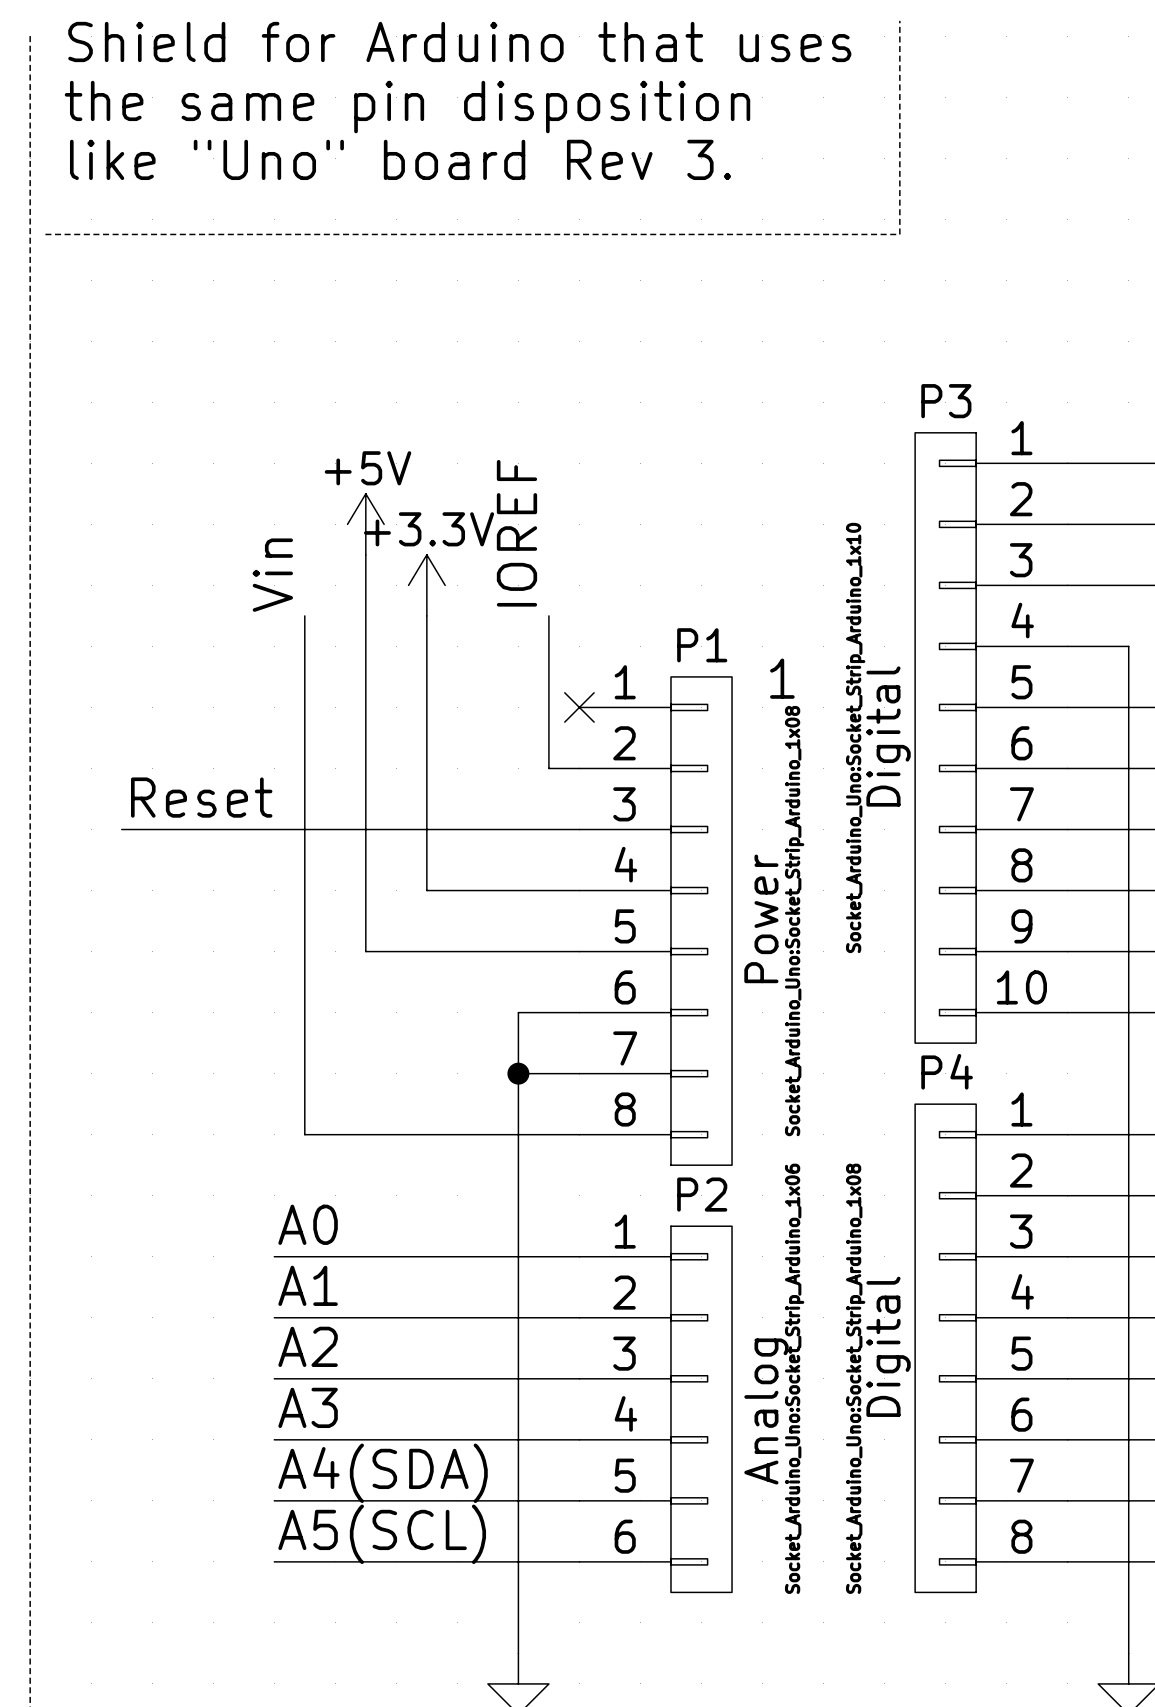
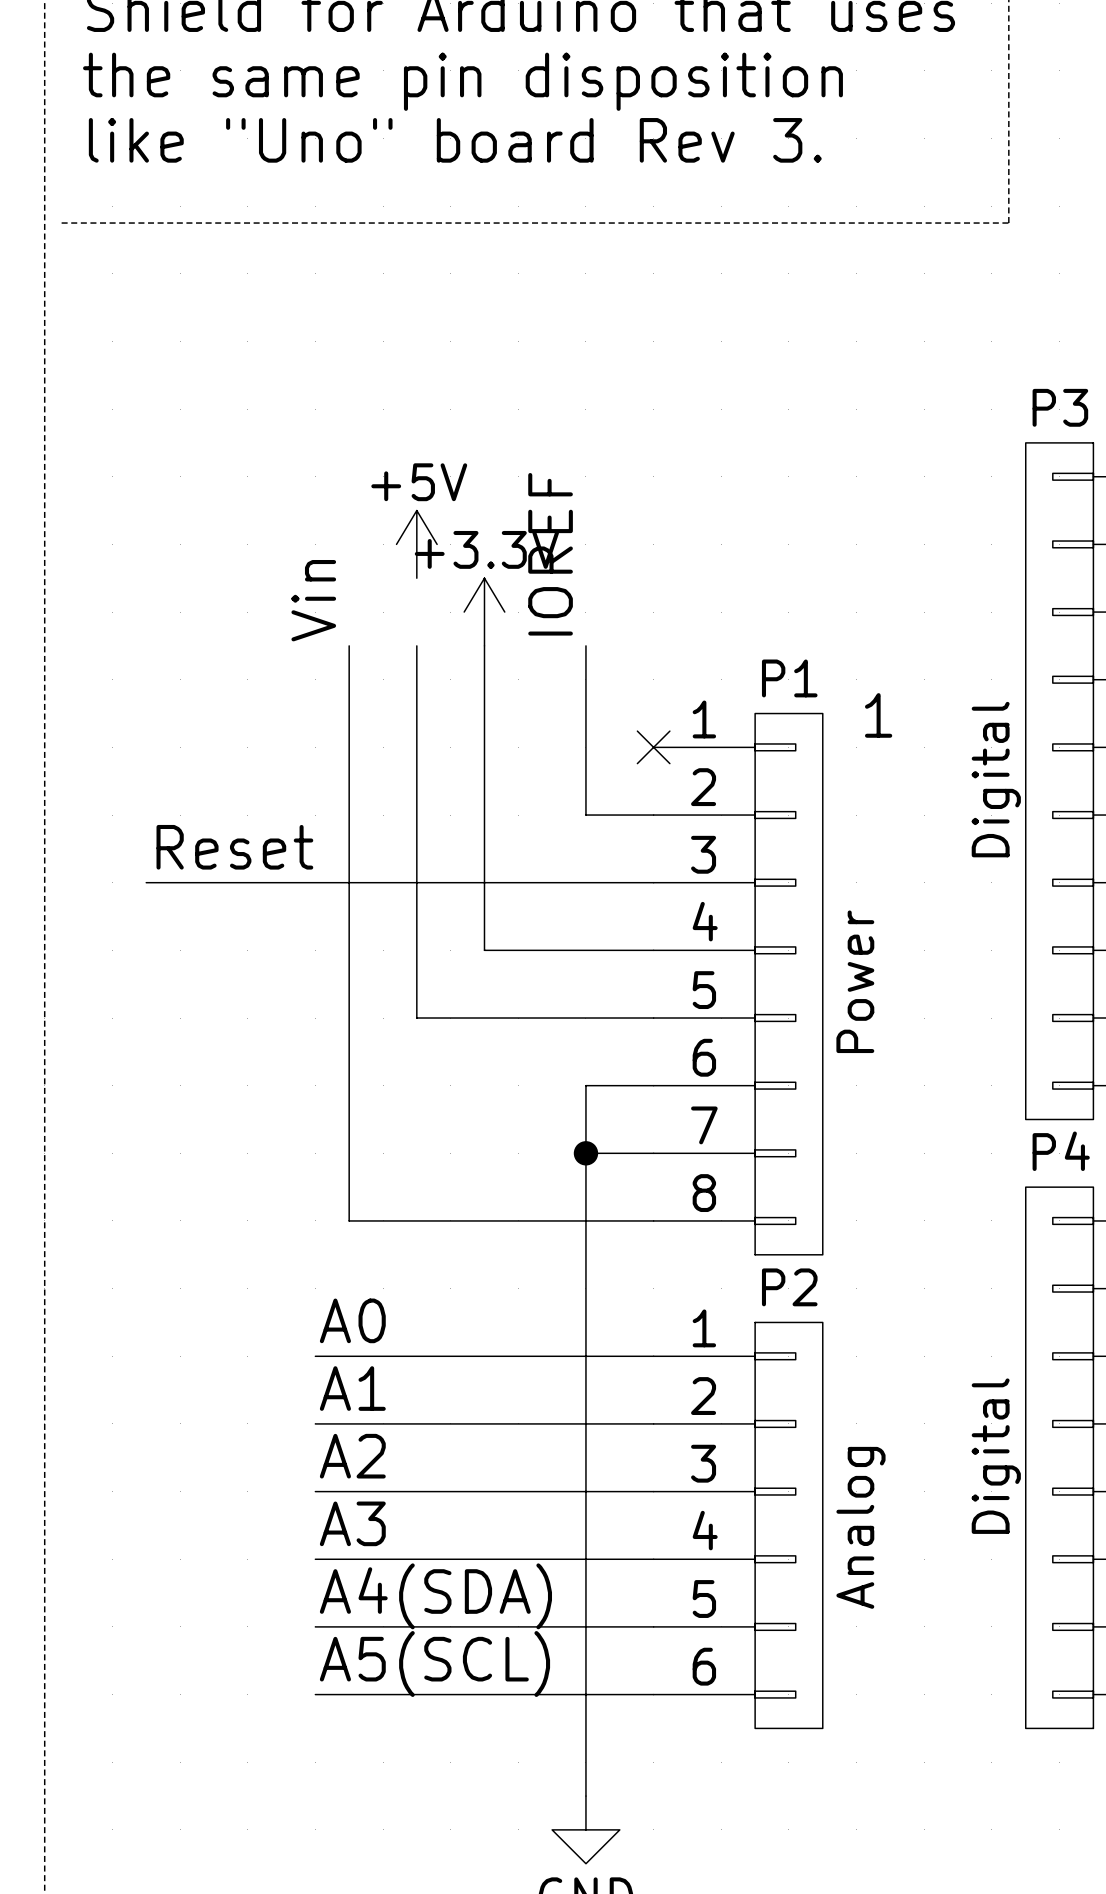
label position: IOREF (516, 533) -> IOREF (550, 554)
wire: (365, 554) (365, 615) -> none
wire: (548, 615) (548, 768) -> (585, 645) (585, 815) (619, 815)
P3 text: Socket_Arduino_Uno:Socket_Strip_Arduino_1x10 (855, 737) -> none
P1 text: Socket_Arduino_Uno:Socket_Strip_Arduino_1x08 (794, 921) -> none
P2 text: Socket_Arduino_Uno:Socket_Strip_Arduino_1x06 (794, 1378) -> none
P4 text: Socket_Arduino_Uno:Socket_Strip_Arduino_1x08 (855, 1378) -> none

